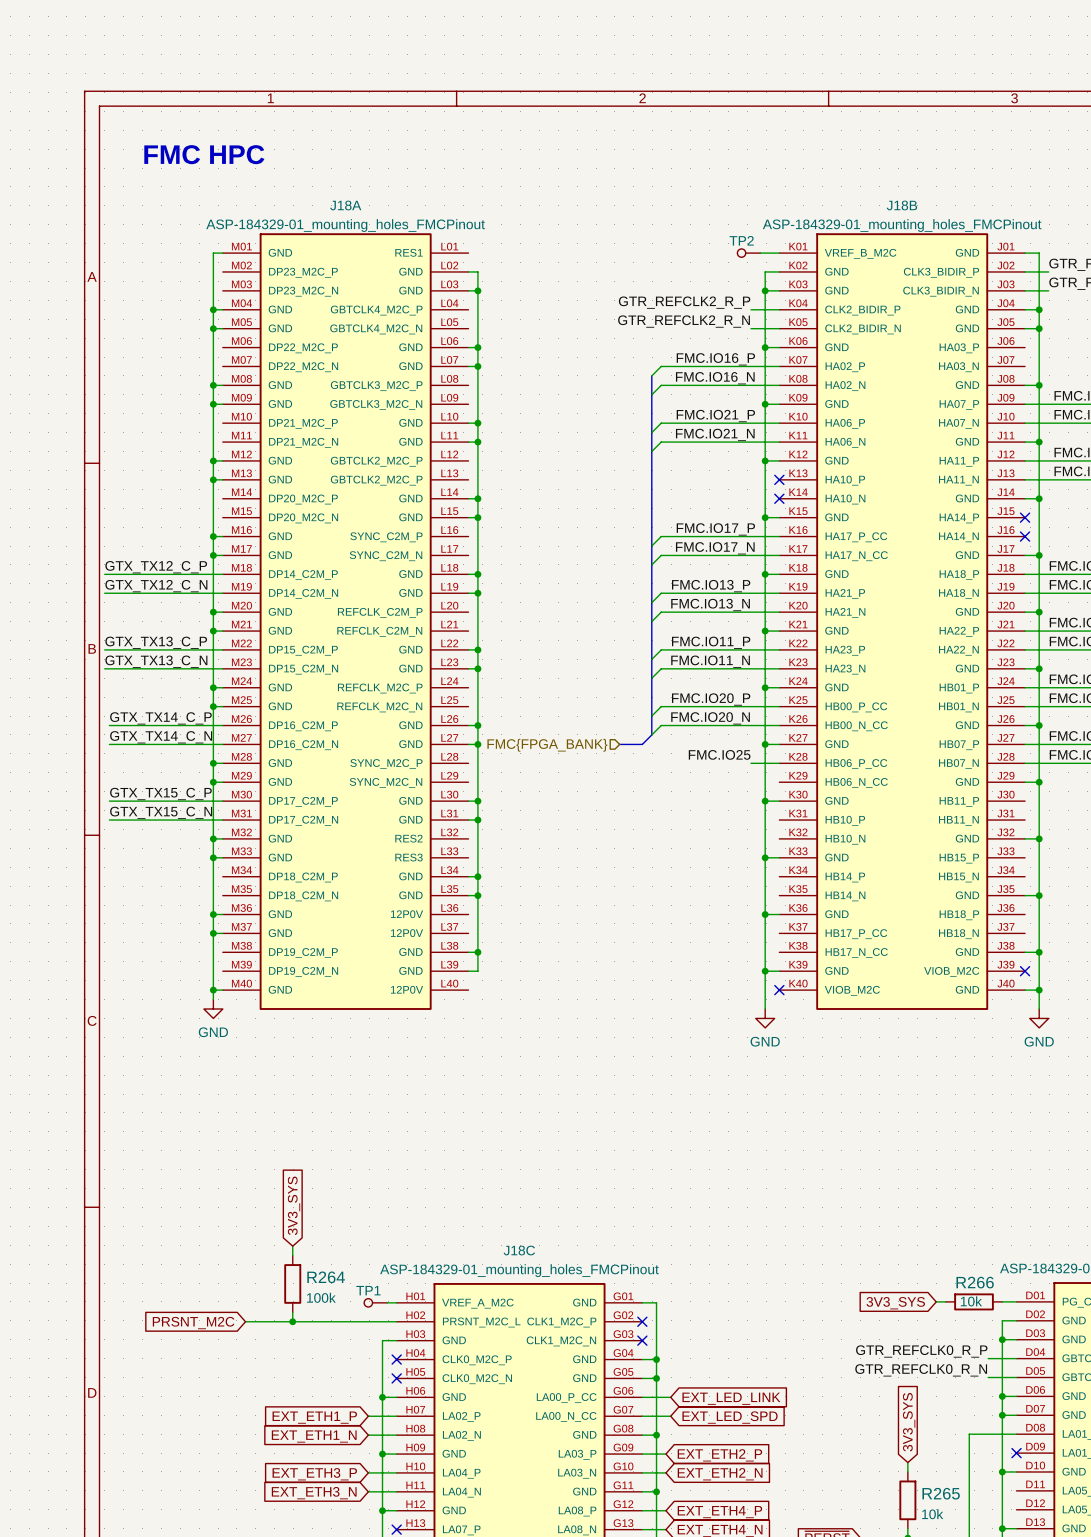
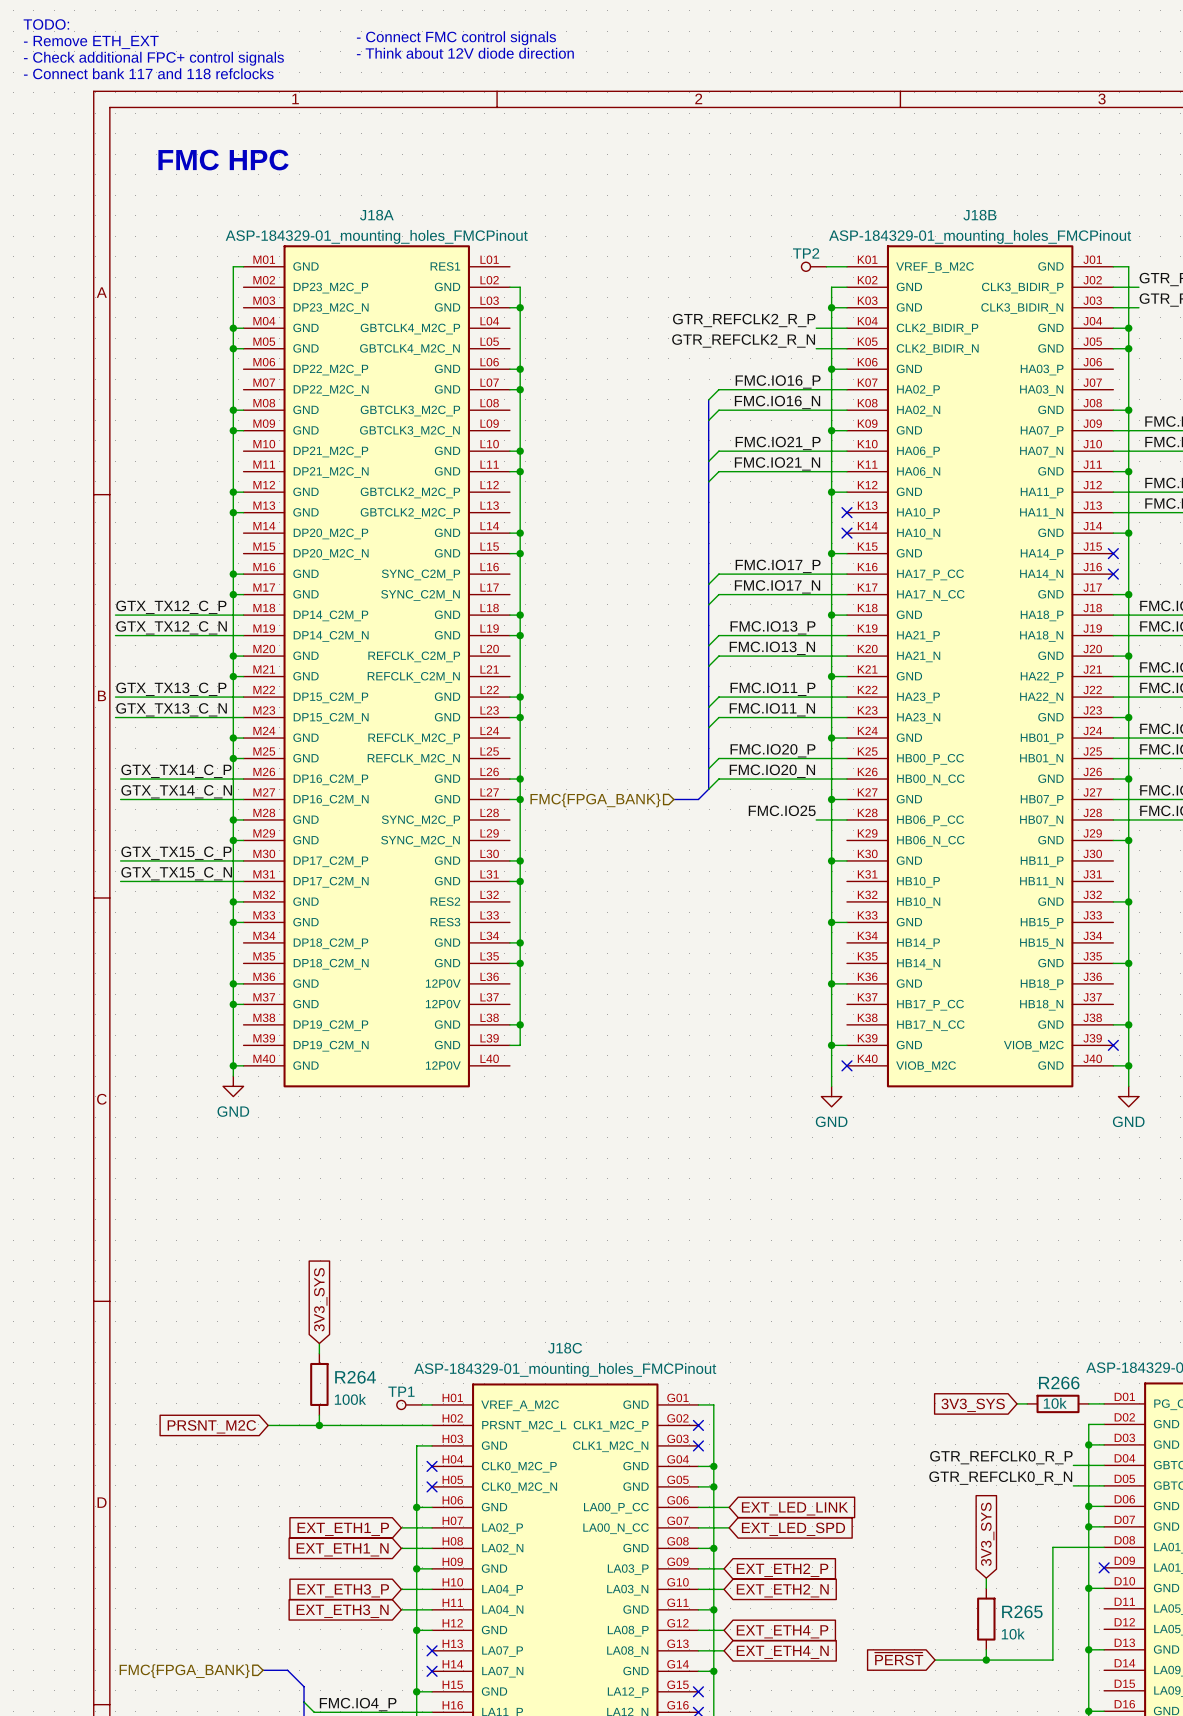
text: none -> TODO: (46, 24)
text: none -> - Connect FMC control signals (456, 38)
text: none -> - Remove ETH_EXT (91, 42)
text: none -> - Think about 12V diode direction (465, 53)
text: none -> - Check additional FPC+ control signals (153, 58)
text: none -> - Connect bank 117 and 118 refclocks (148, 73)

